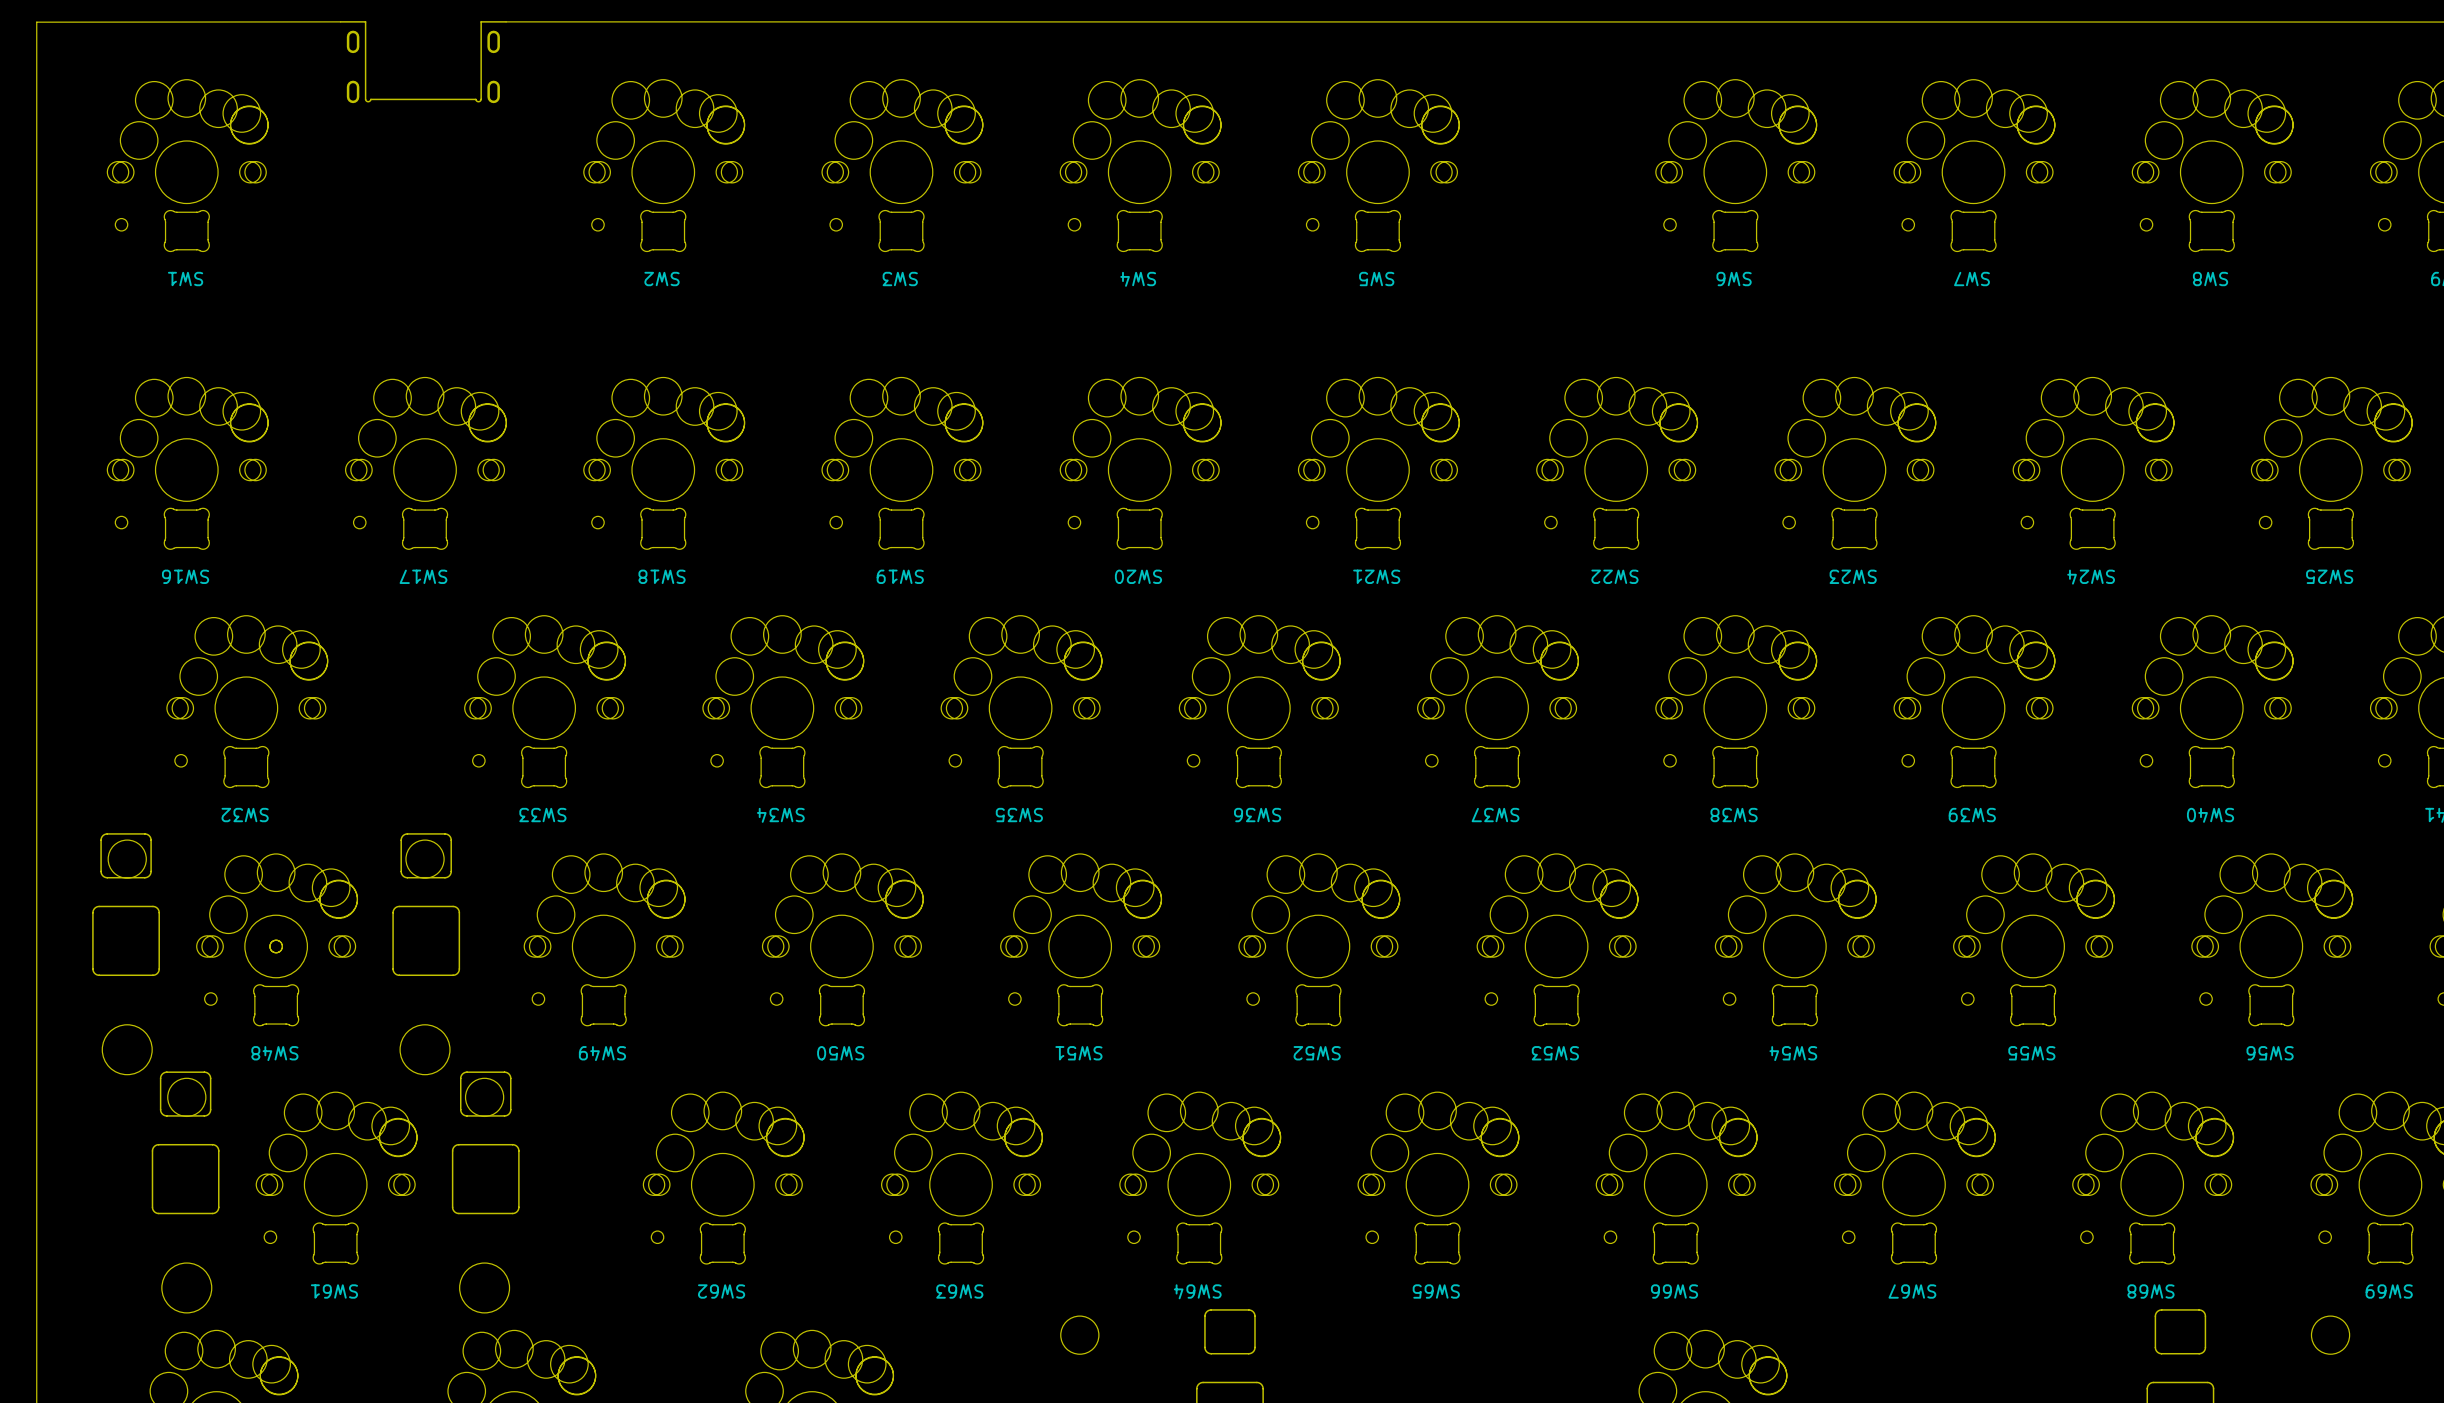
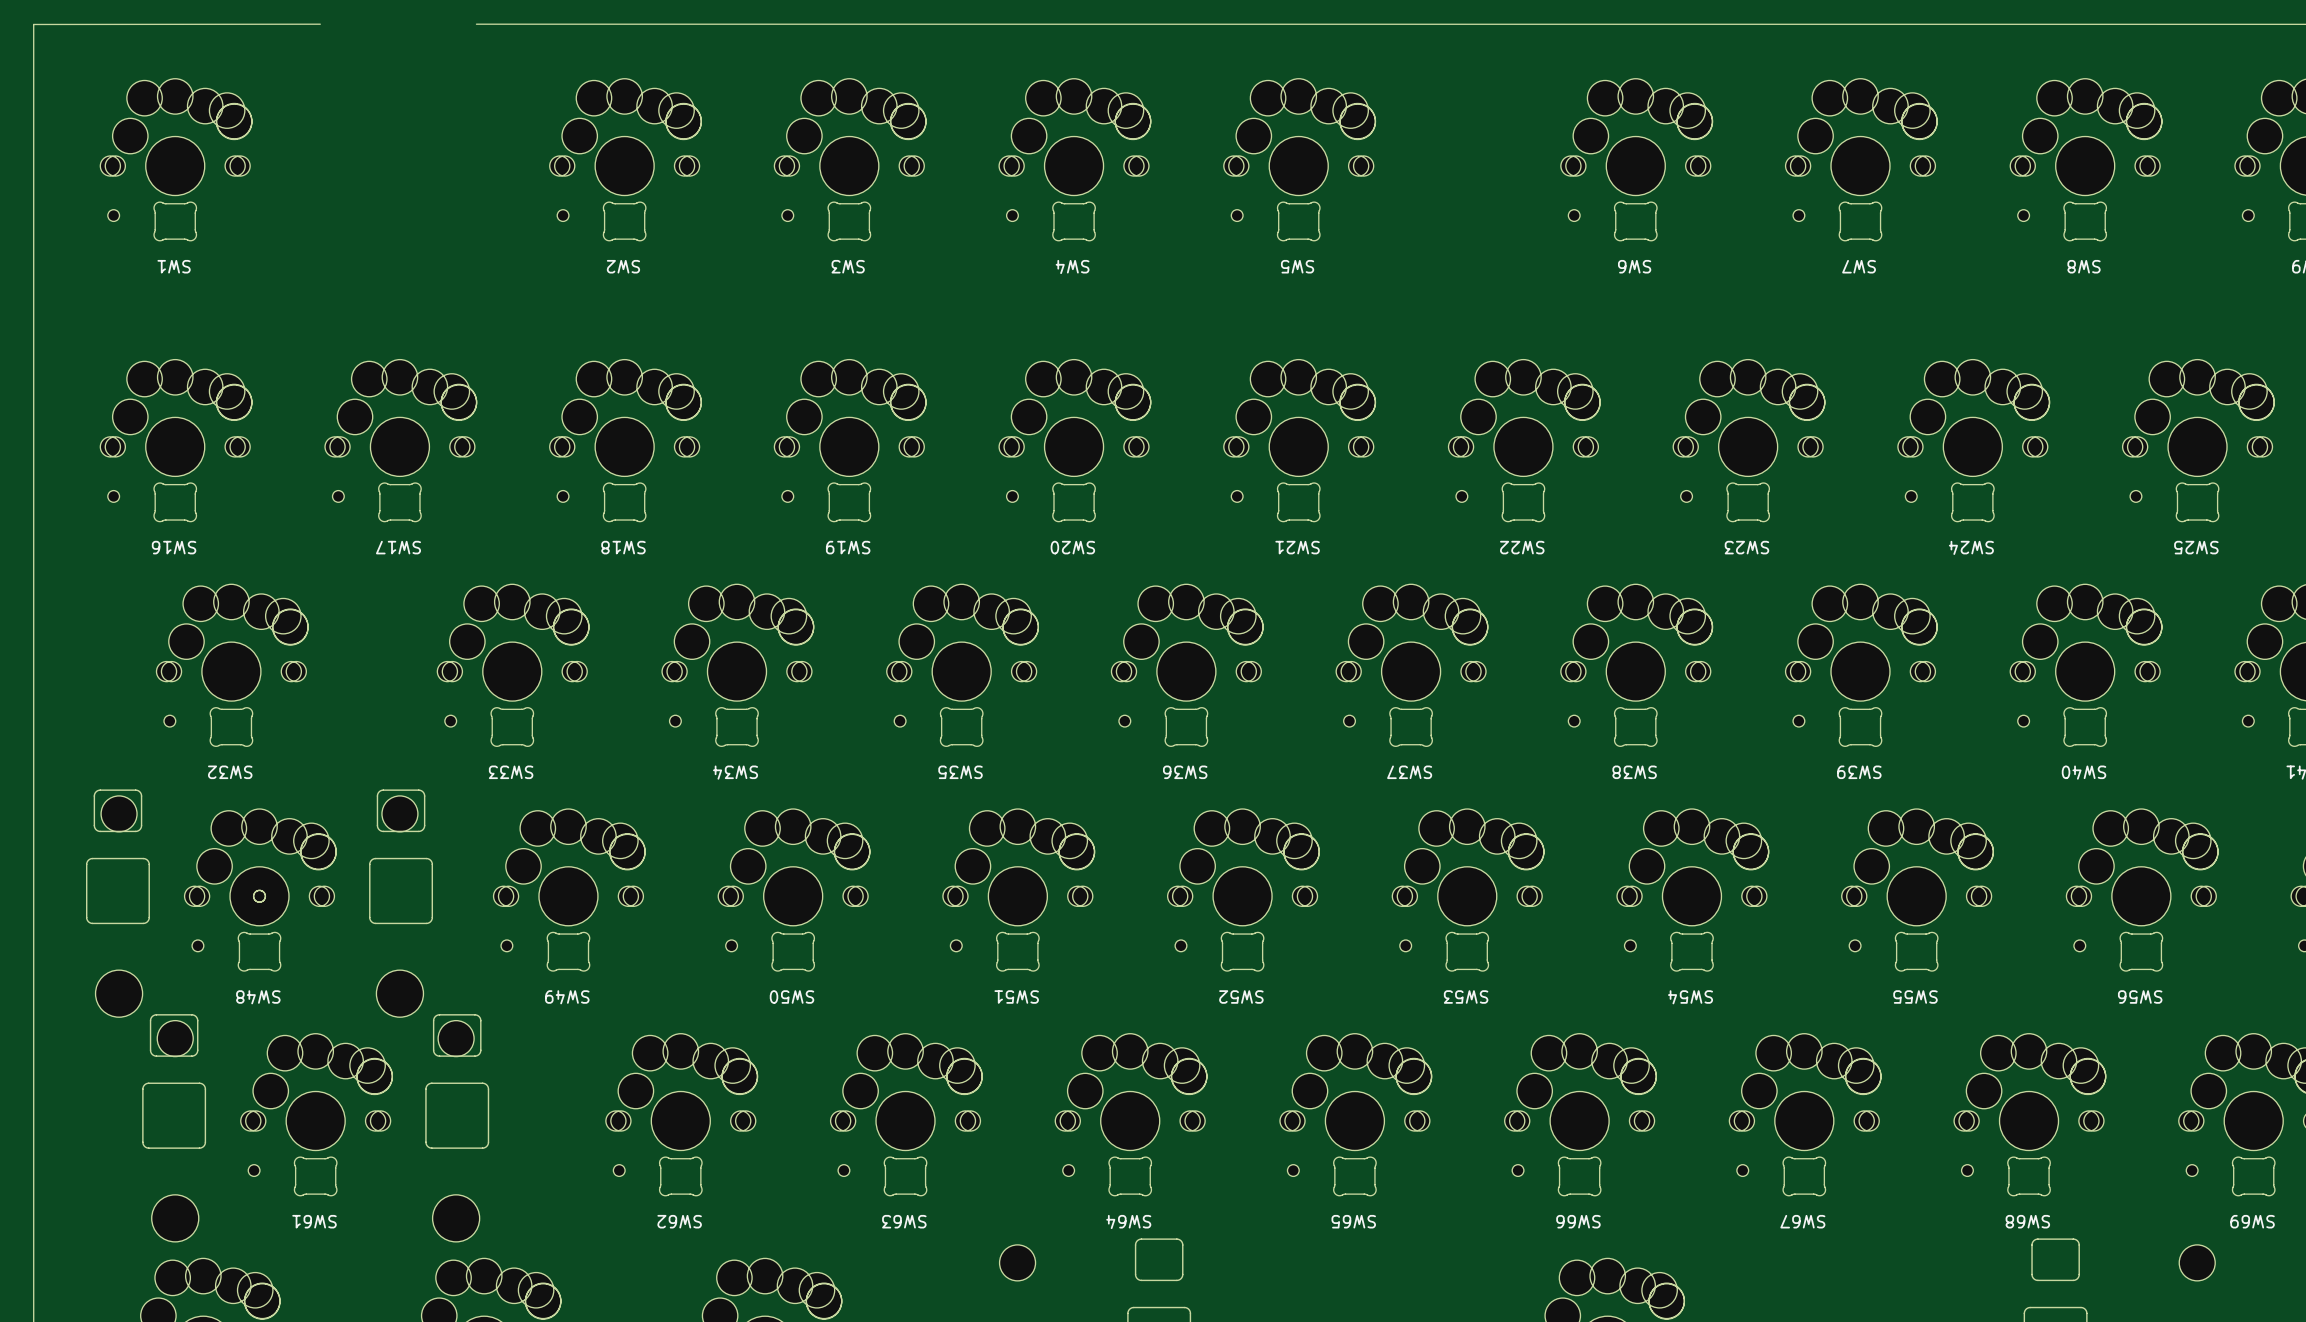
part: (423, 62) -> none

